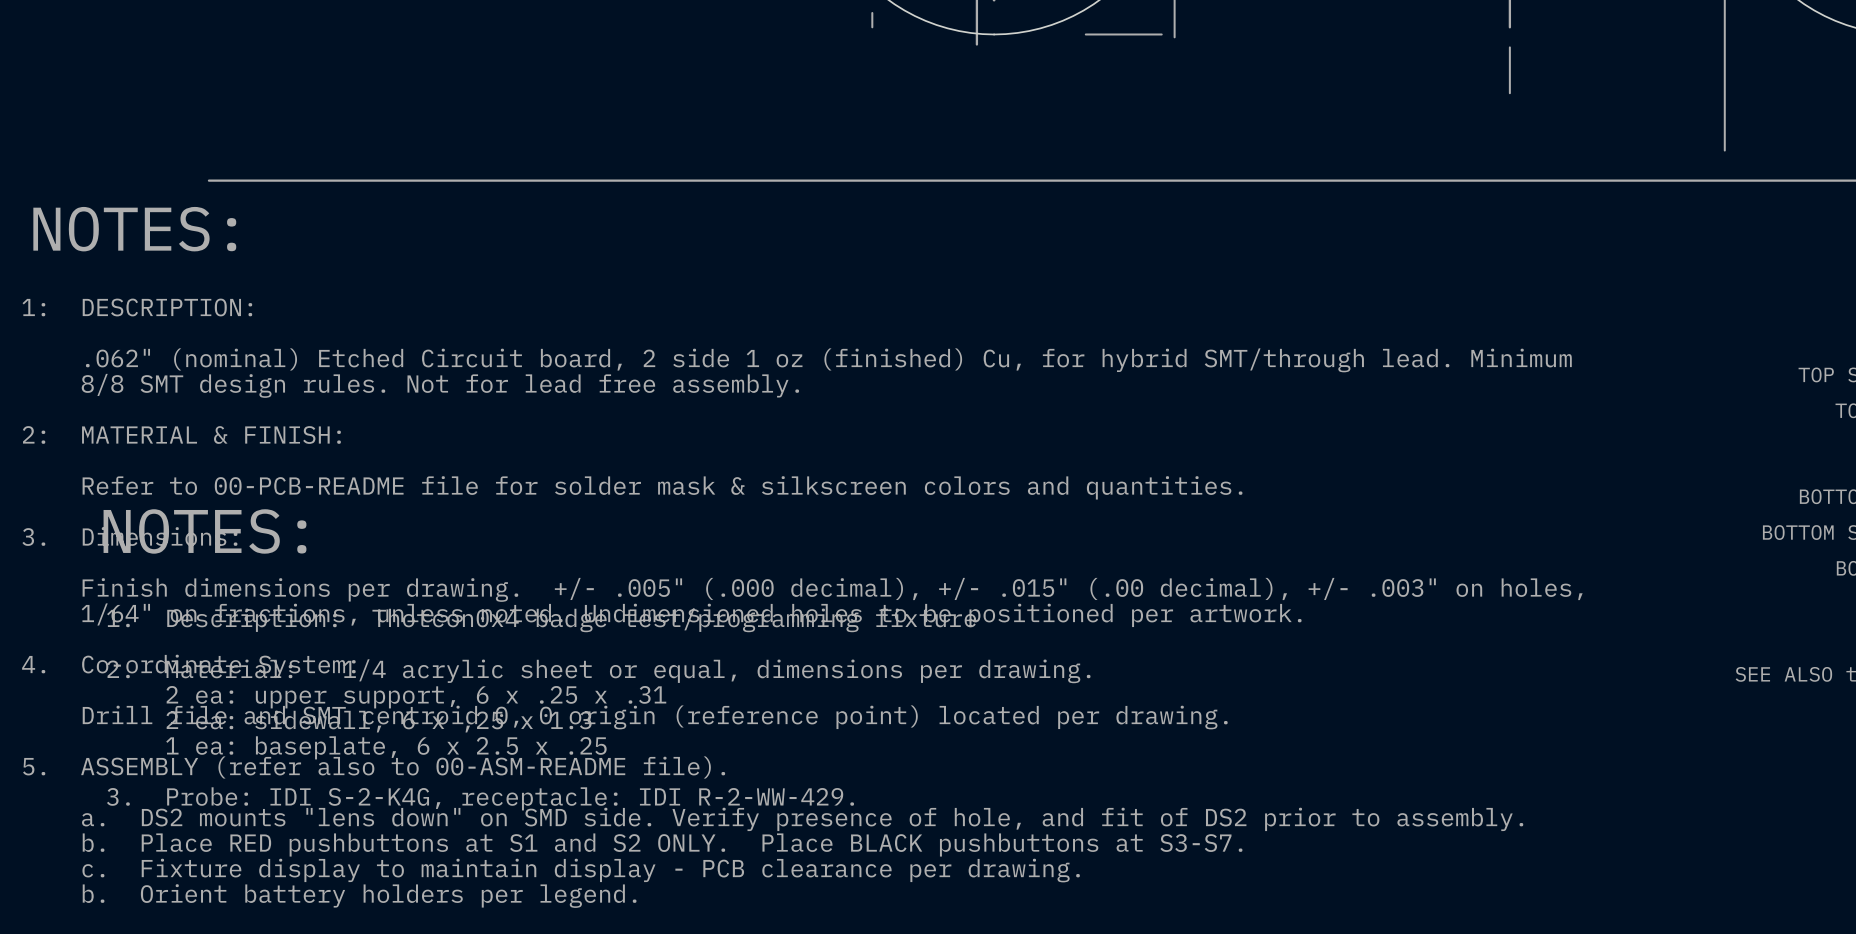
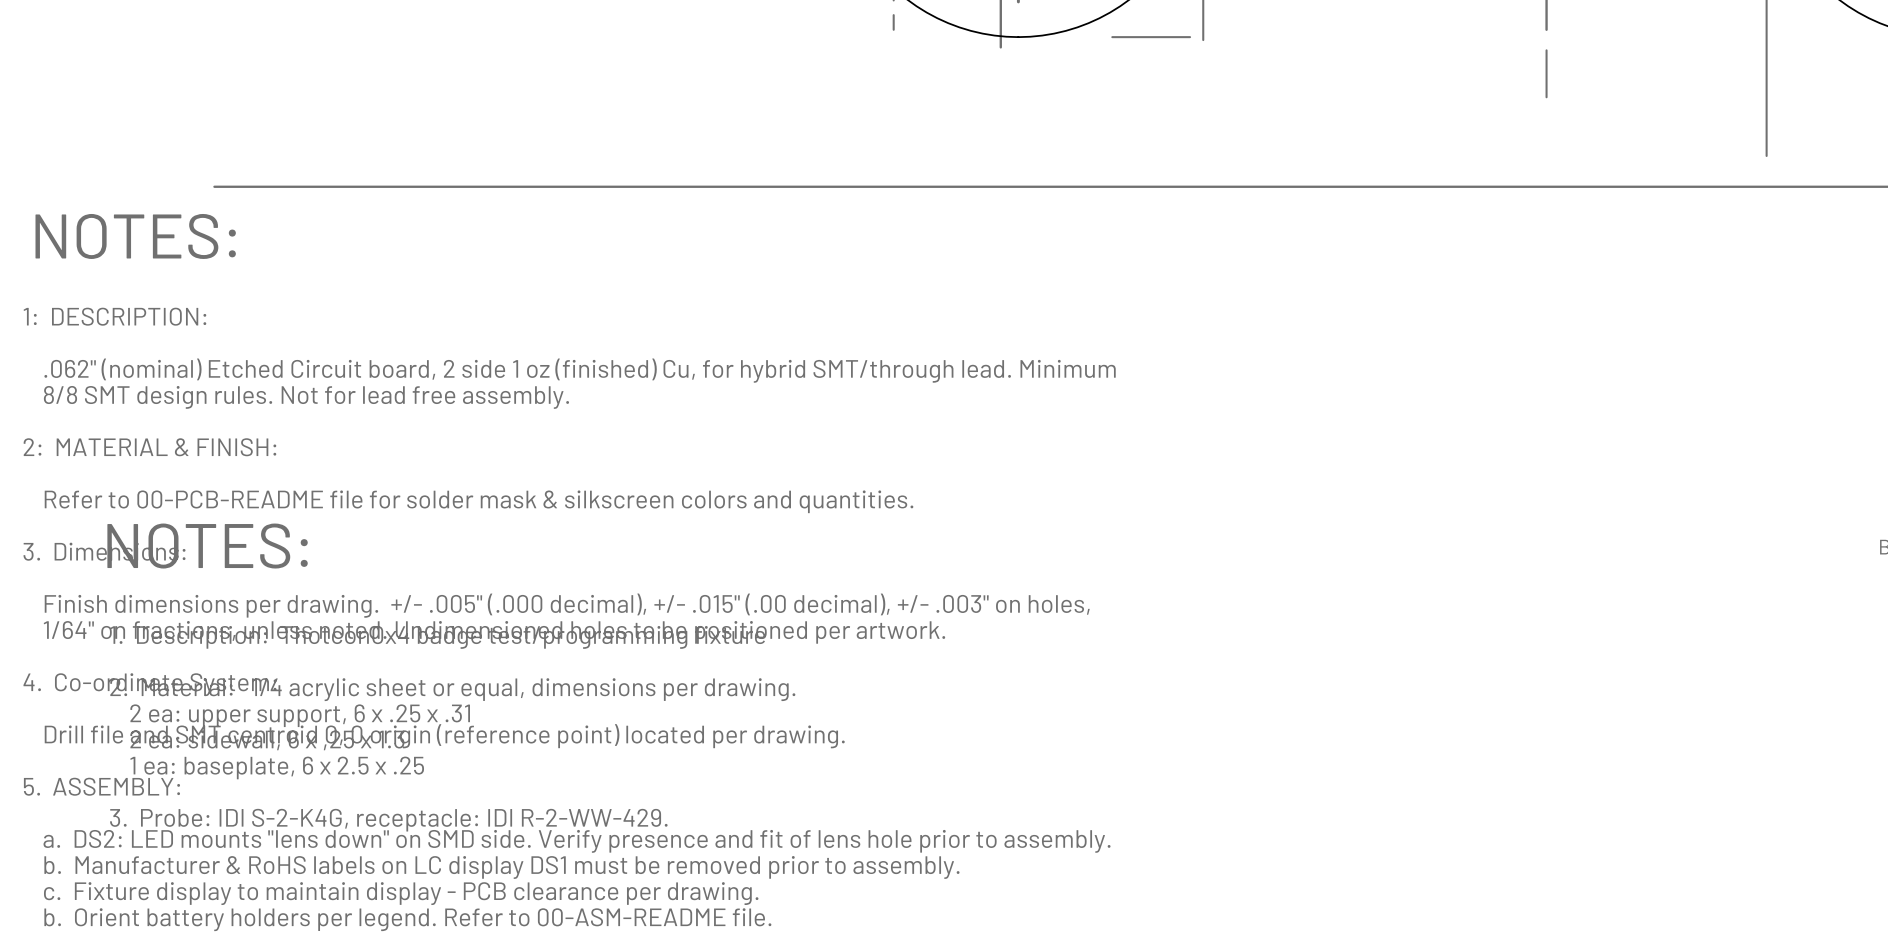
text: 5. ASSEMBLY (refer also to 00-ASM-README file). (374, 767) -> 5. ASSEMBLY: (101, 786)
text: a. DS2 mounts "lens down" on SMD side. Verify presence of hole, and fit of DS2 prior to assembly. (802, 819) -> a. DS2: LED mounts "lens down" on SMD side. Verify presence and fit of lens hole prior to assembly. (577, 841)
text: b. Place RED pushbuttons at S1 and S2 ONLY. Place BLACK pushbuttons at S3-S7. (662, 845) -> b. Manufacturer & RoHS labels on LC display DS1 must be removed prior to assembly. (501, 867)
text: b. Orient battery holders per legend. (359, 896) -> b. Orient battery holders per legend. Refer to 00-ASM-README file. (407, 919)

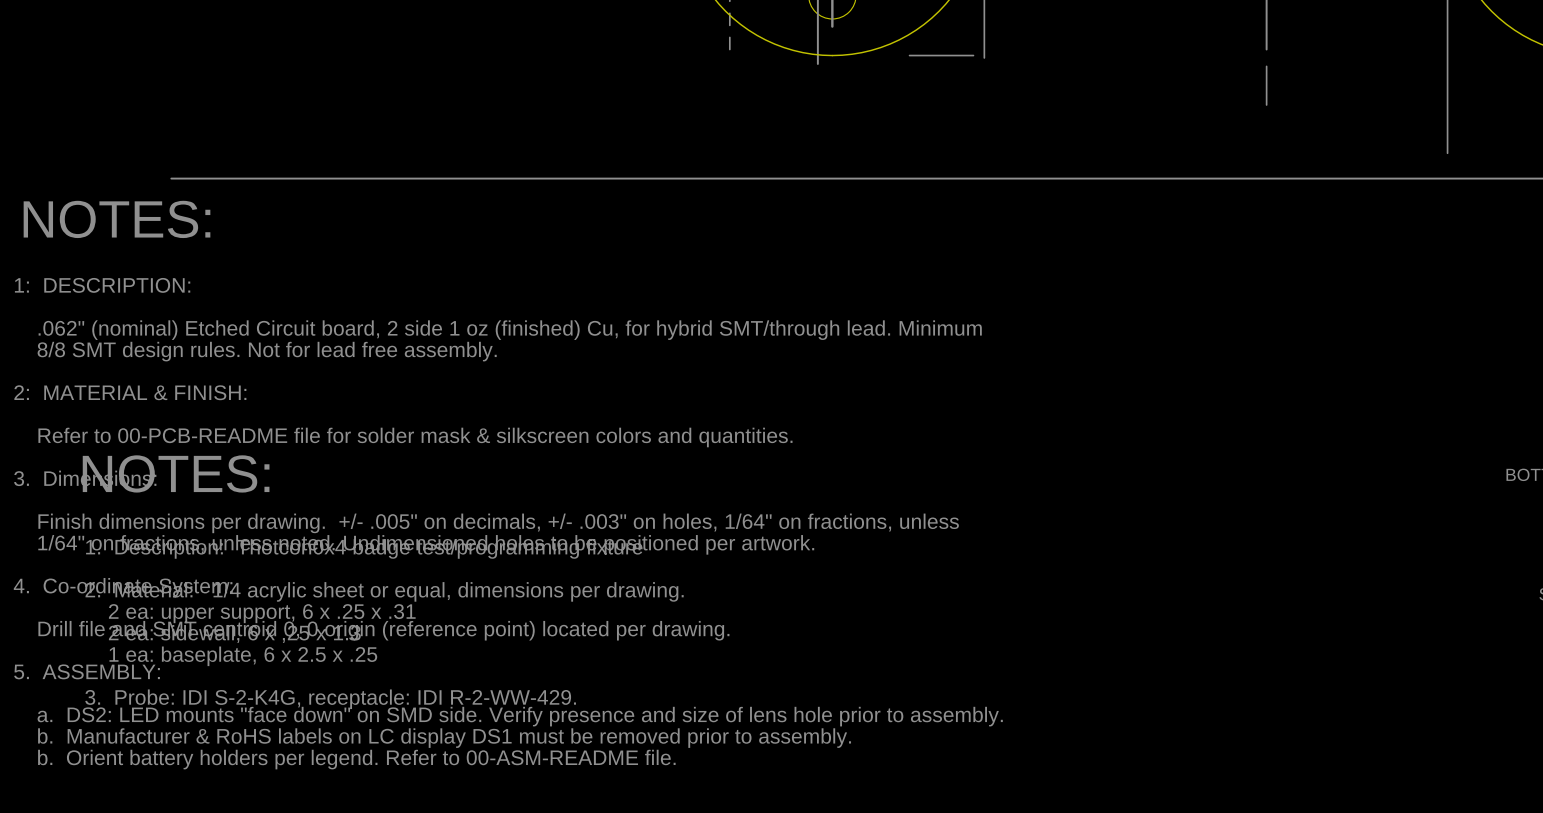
text: Finish dimensions per drawing. +/- .005" (.000 decimal), +/- .015" (.00 decimal), +/- .003" on holes, (567, 605) -> Finish dimensions per drawing. +/- .005" on decimals, +/- .003" on holes, 1/64" on fractions, unless (498, 523)
text: a. DS2: LED mounts "lens down" on SMD side. Verify presence and fit of lens hole prior to assembly. (577, 841) -> a. DS2: LED mounts "face down" on SMD side. Verify presence and size of lens hole prior to assembly. (520, 716)
text: c. Fixture display to maintain display - PCB clearance per drawing. (401, 893) -> b. Orient battery holders per legend. Refer to 00-ASM-README file. (356, 759)
text: b. Orient battery holders per legend. Refer to 00-ASM-README file. (407, 919) -> none

